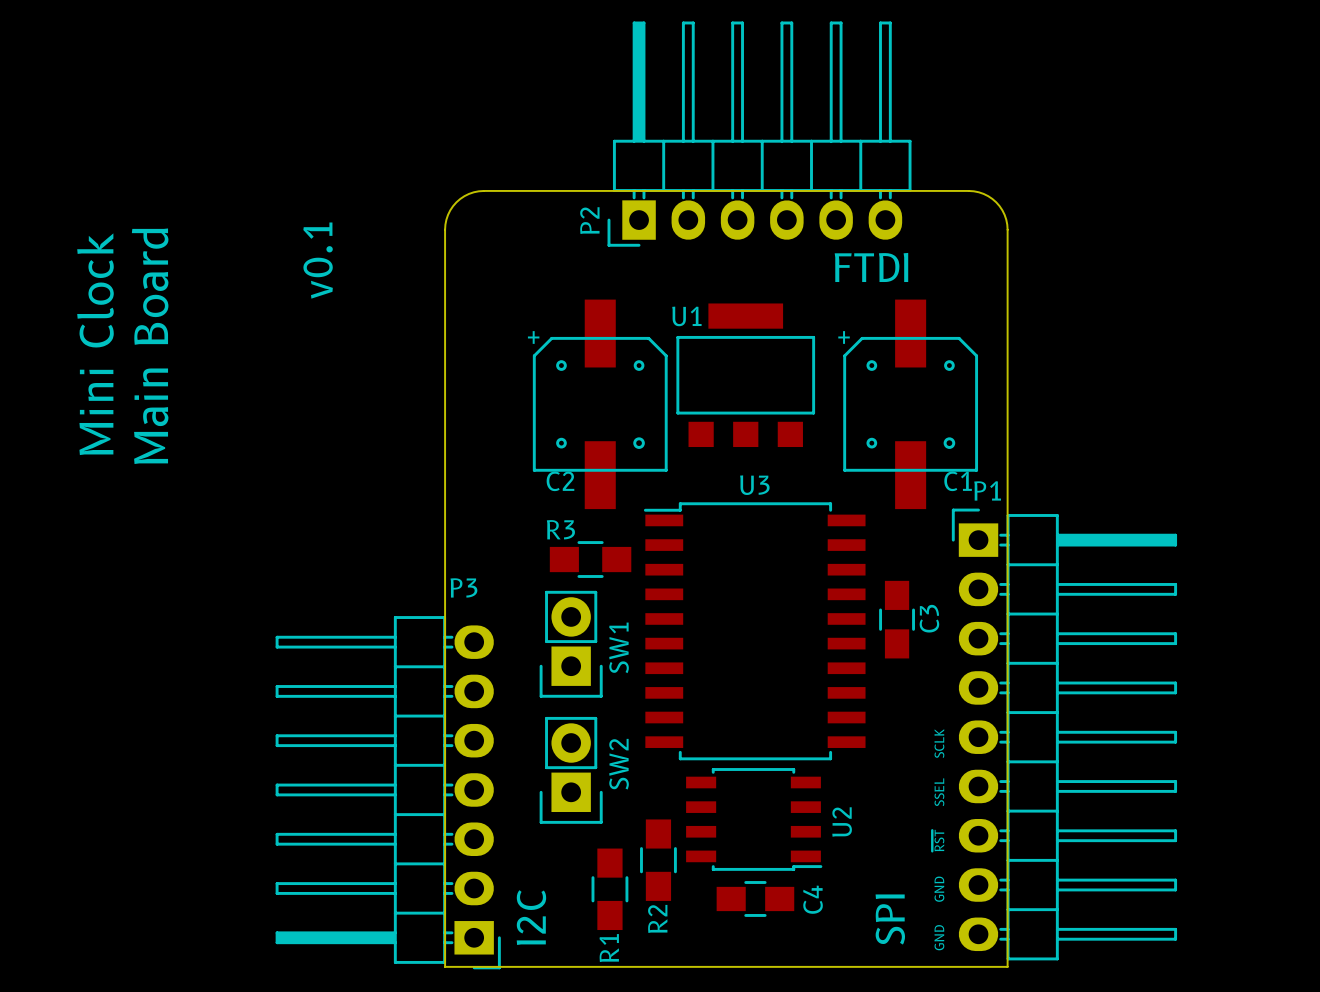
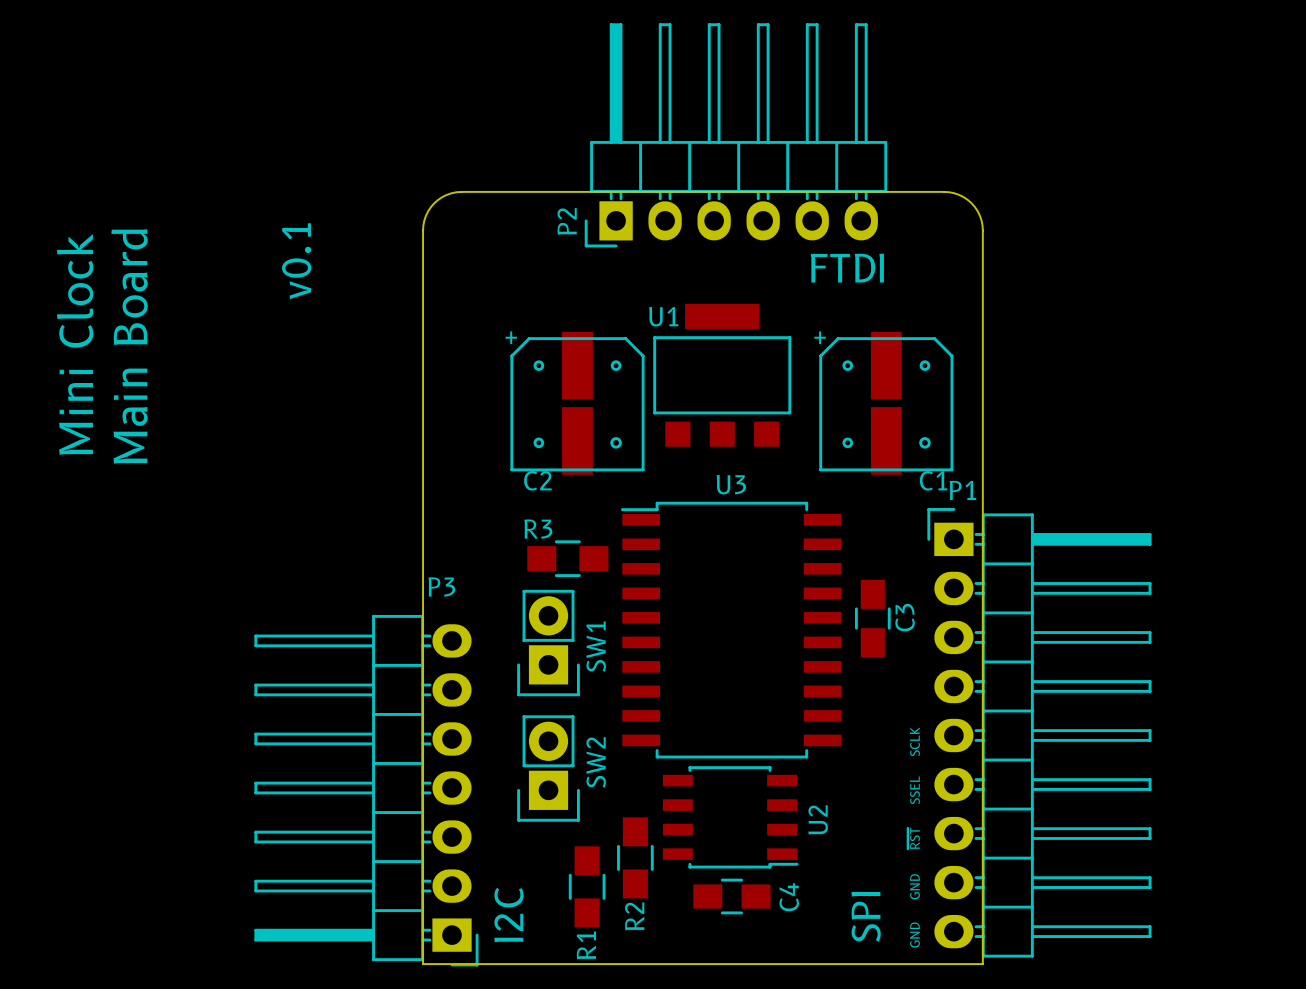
C2 footprint: [532, 299, 668, 510] -> [510, 331, 645, 475]
C1 footprint: [843, 299, 979, 510] -> [819, 331, 954, 475]

